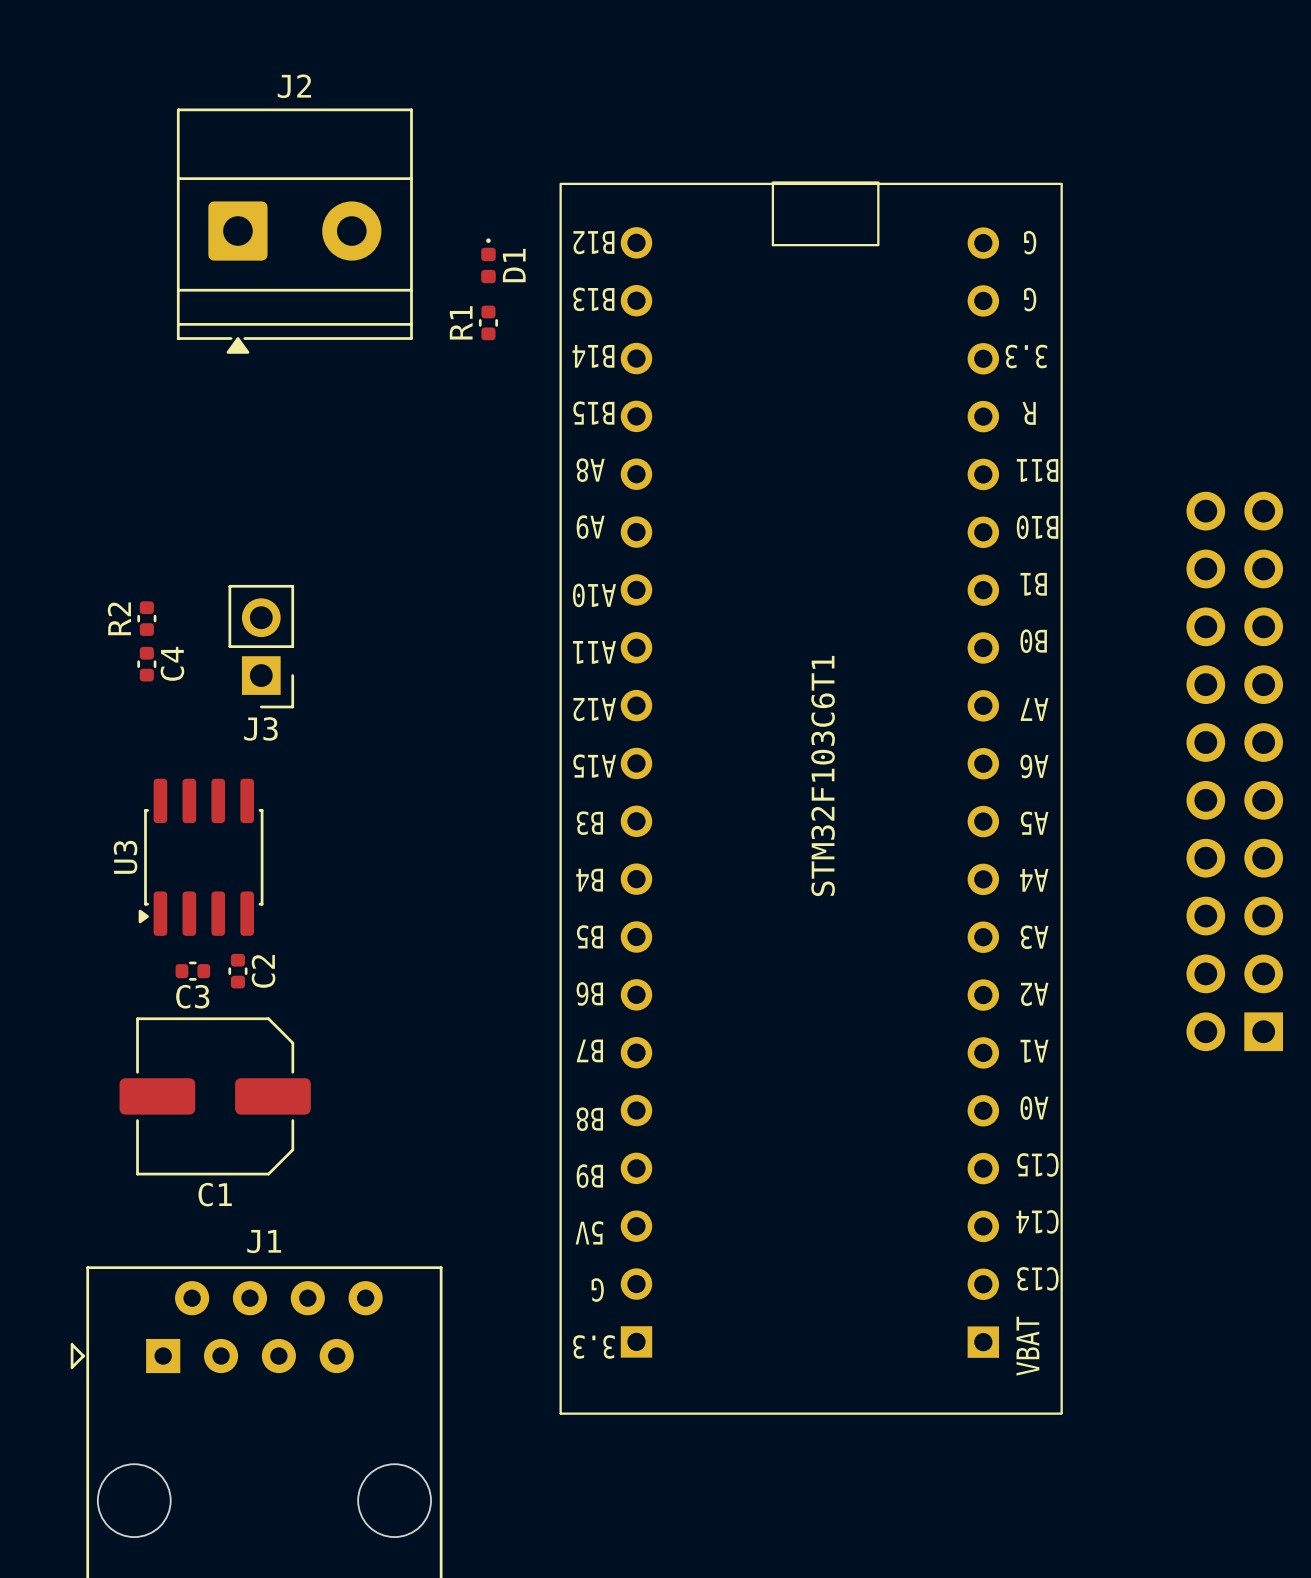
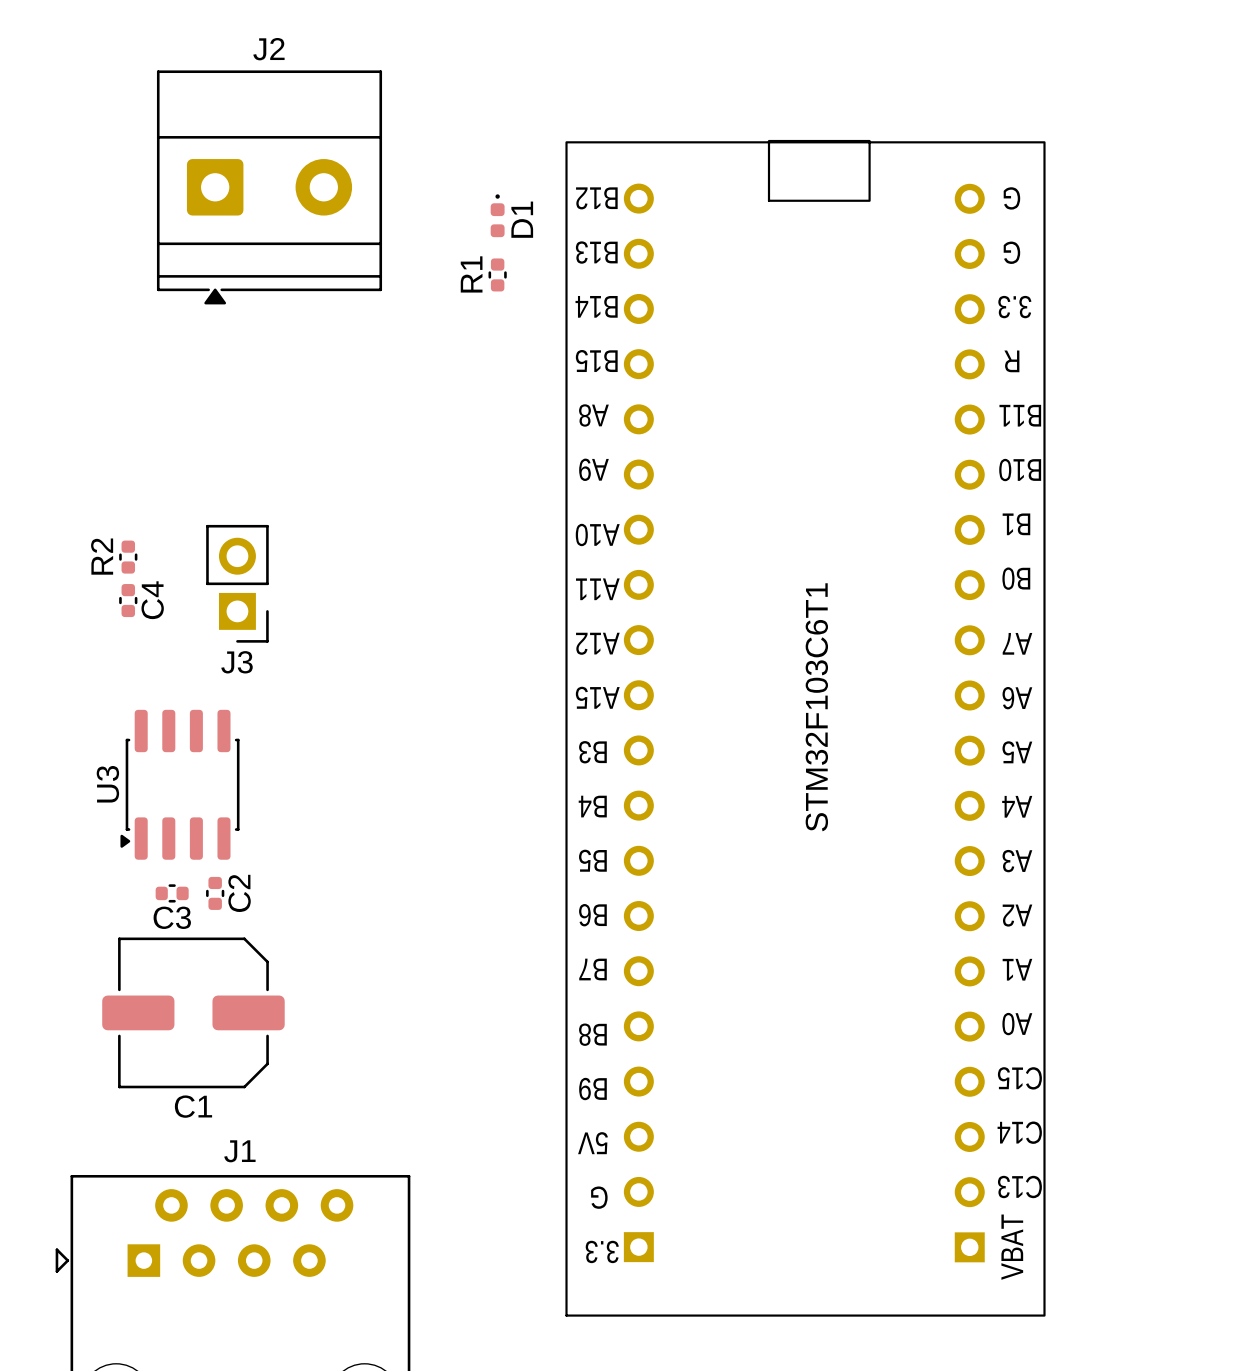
D1 position: (488, 260) -> (497, 215)
R1 position: (488, 322) -> (497, 274)
part: (1234, 771) -> none
STM32F103C6T1 position: (811, 798) -> (805, 728)

